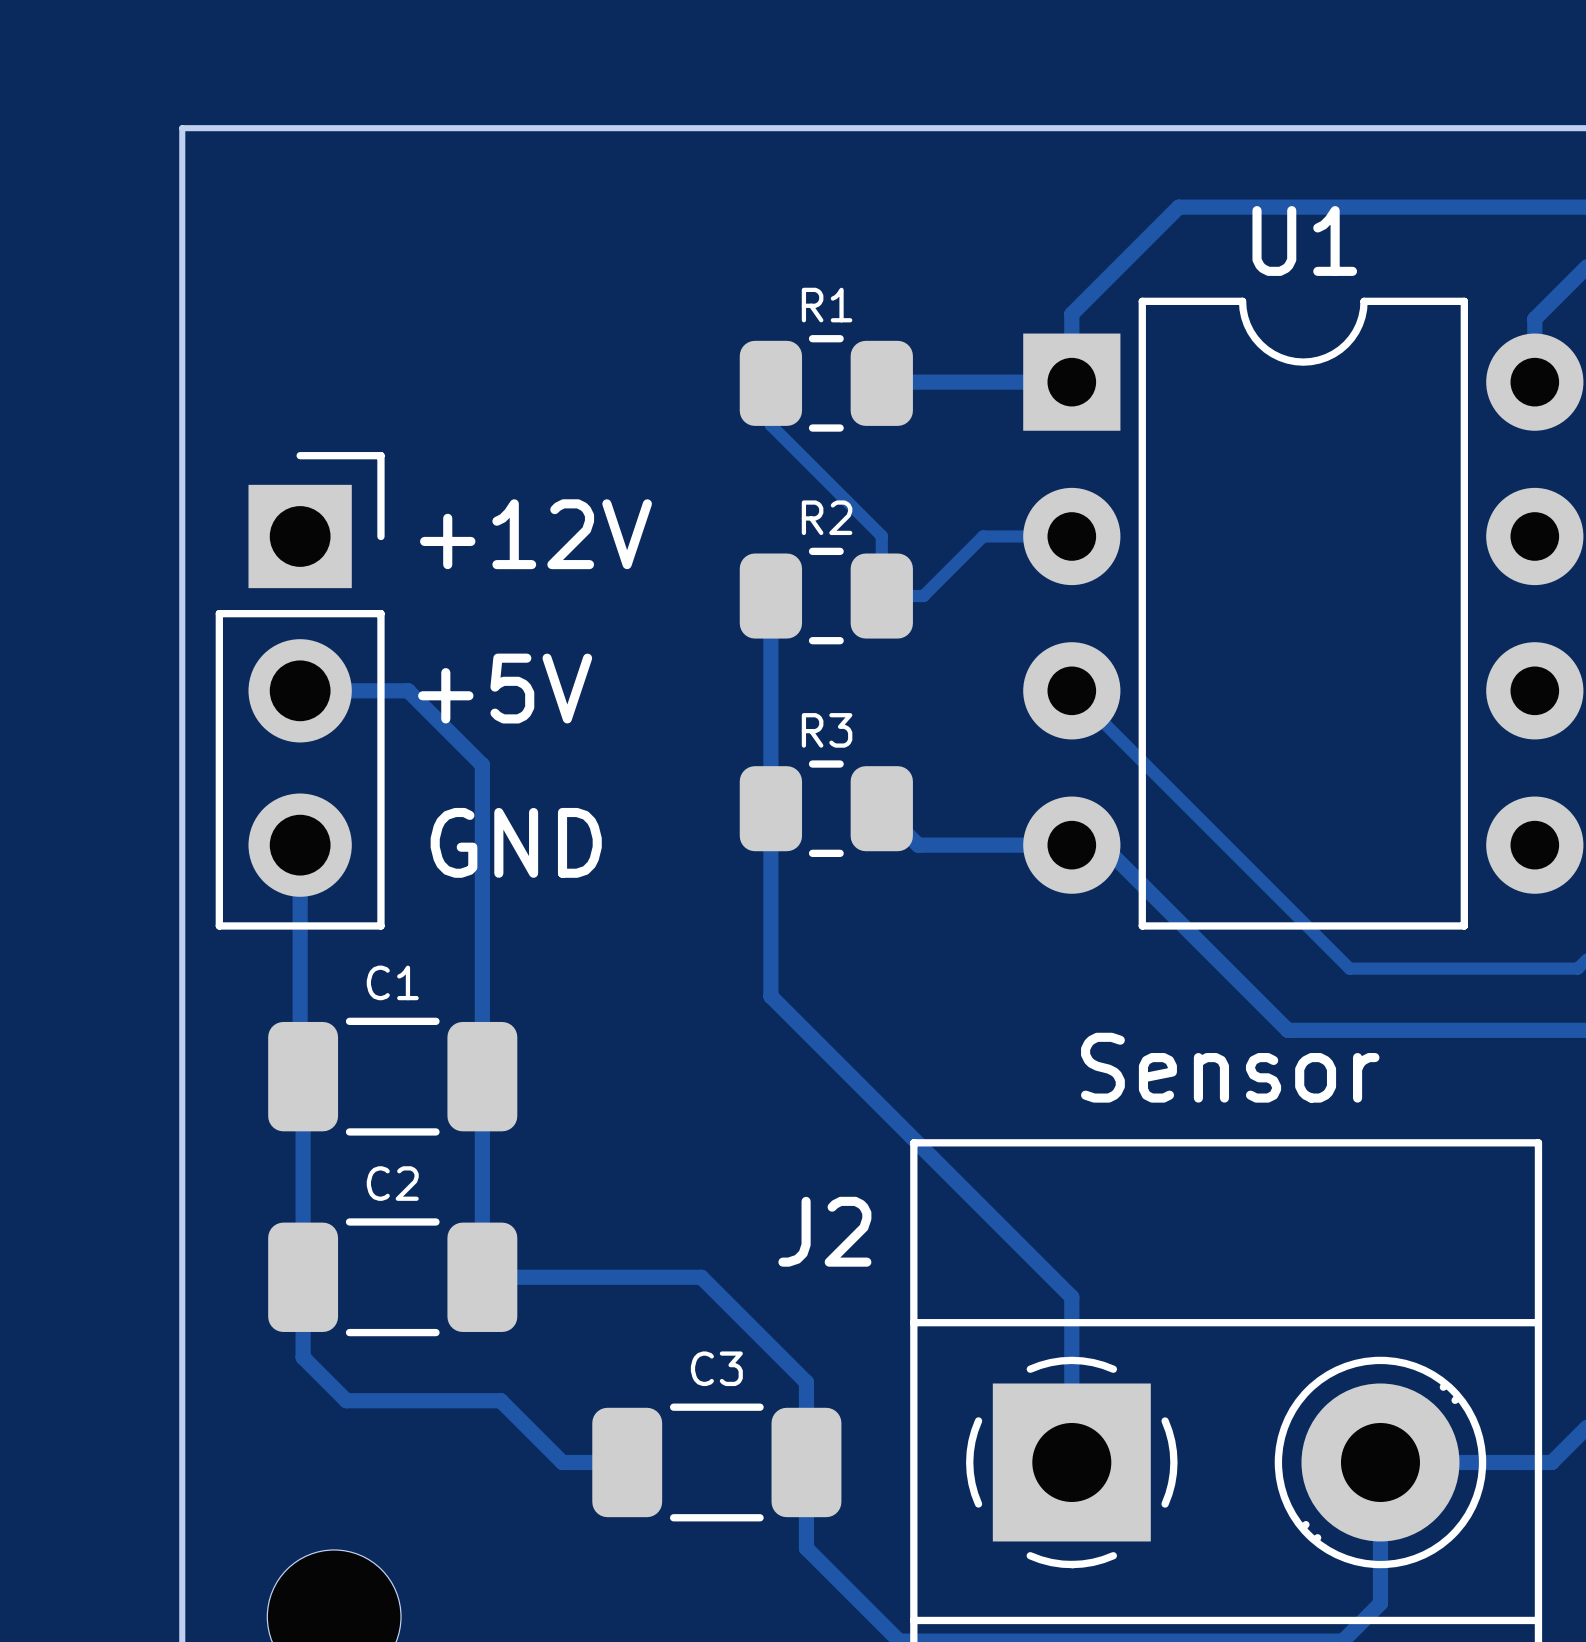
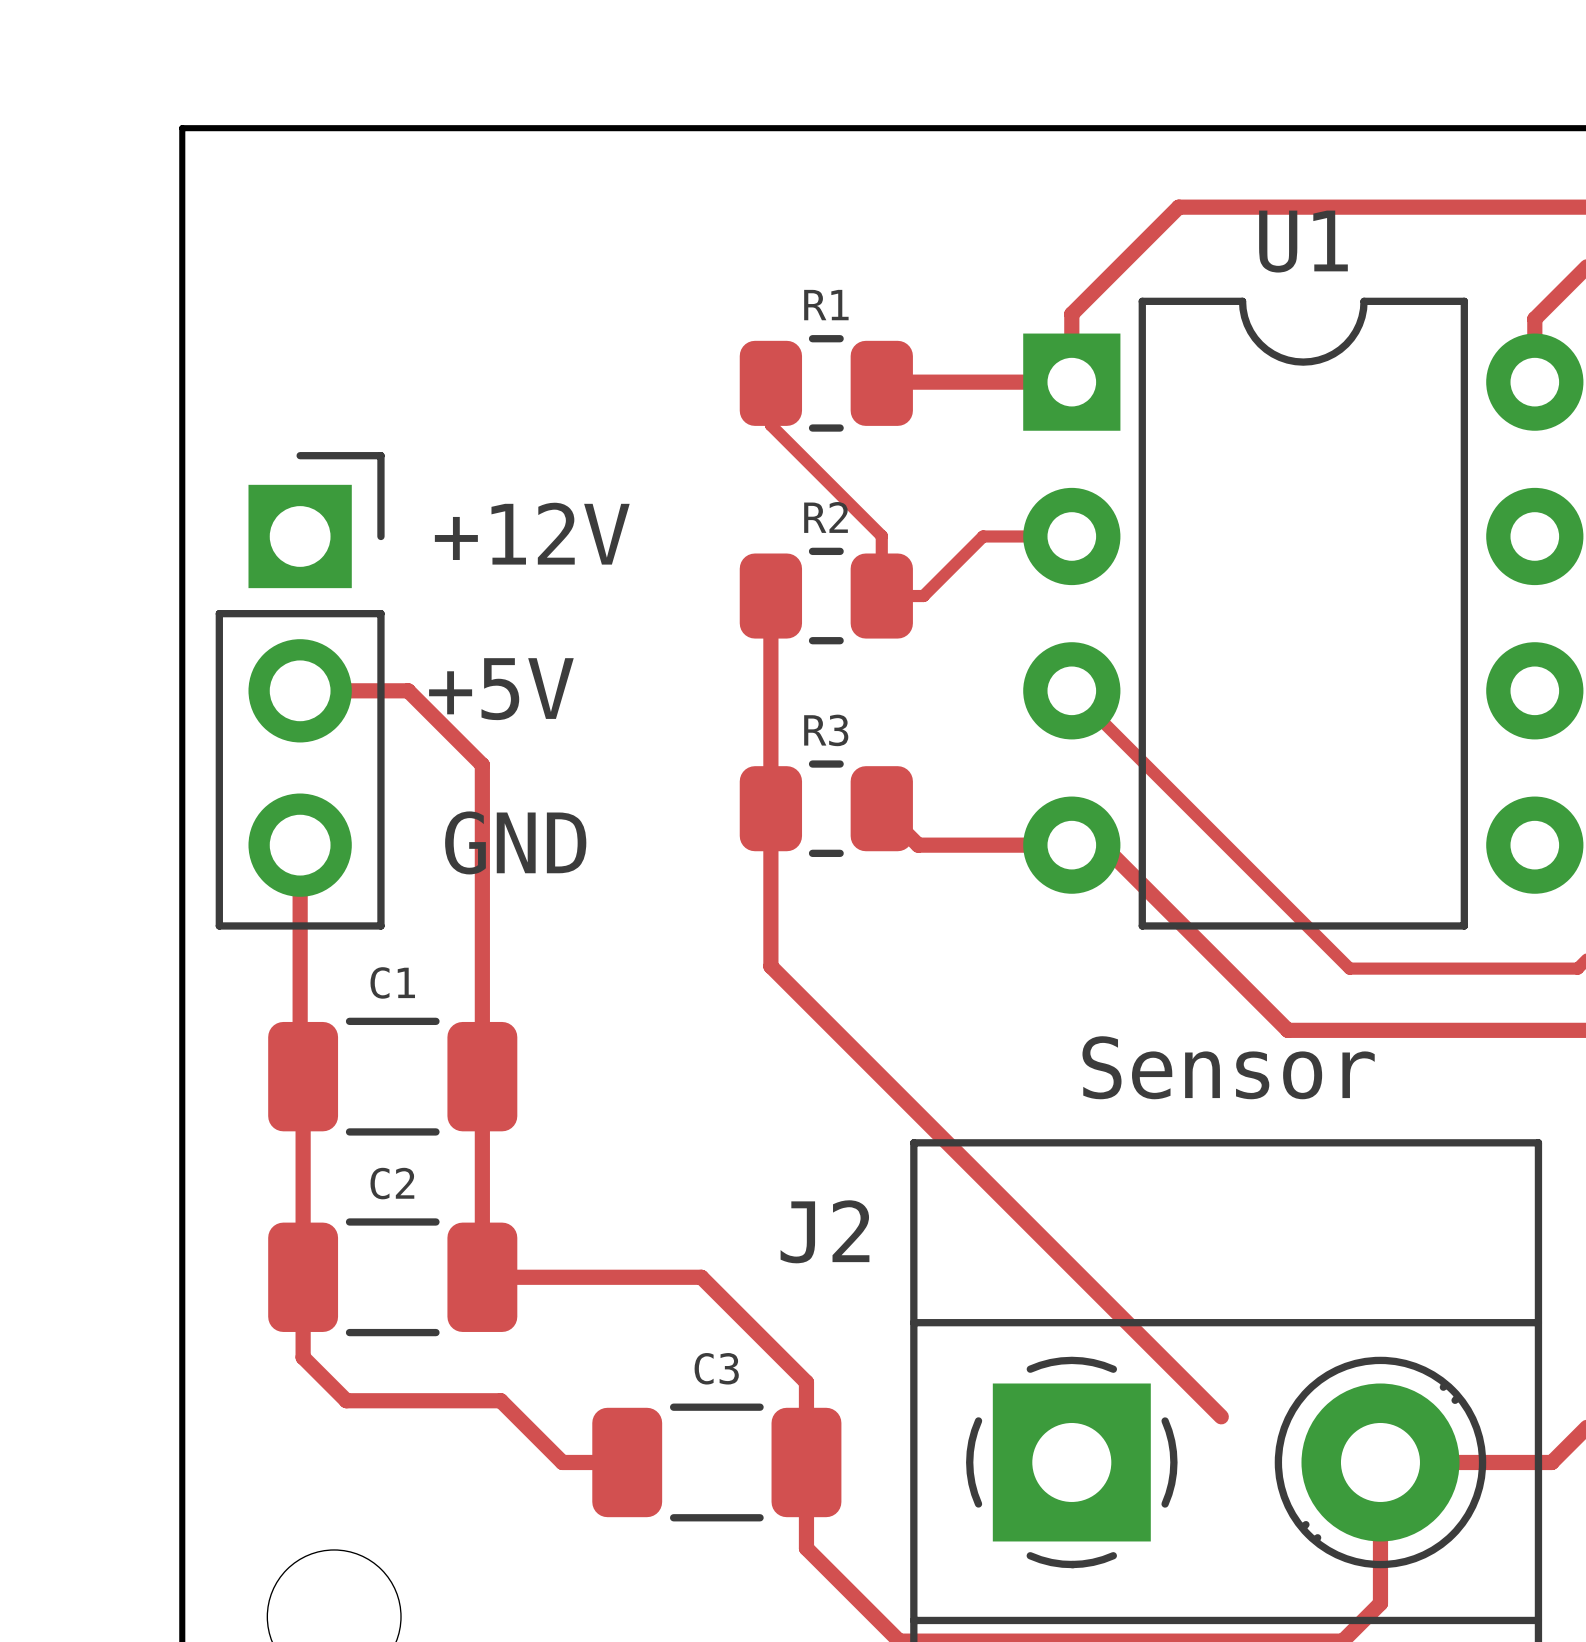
track: (770, 966) (770, 996) (1071, 1297) (1071, 1462) -> (770, 966) (1221, 1416)

